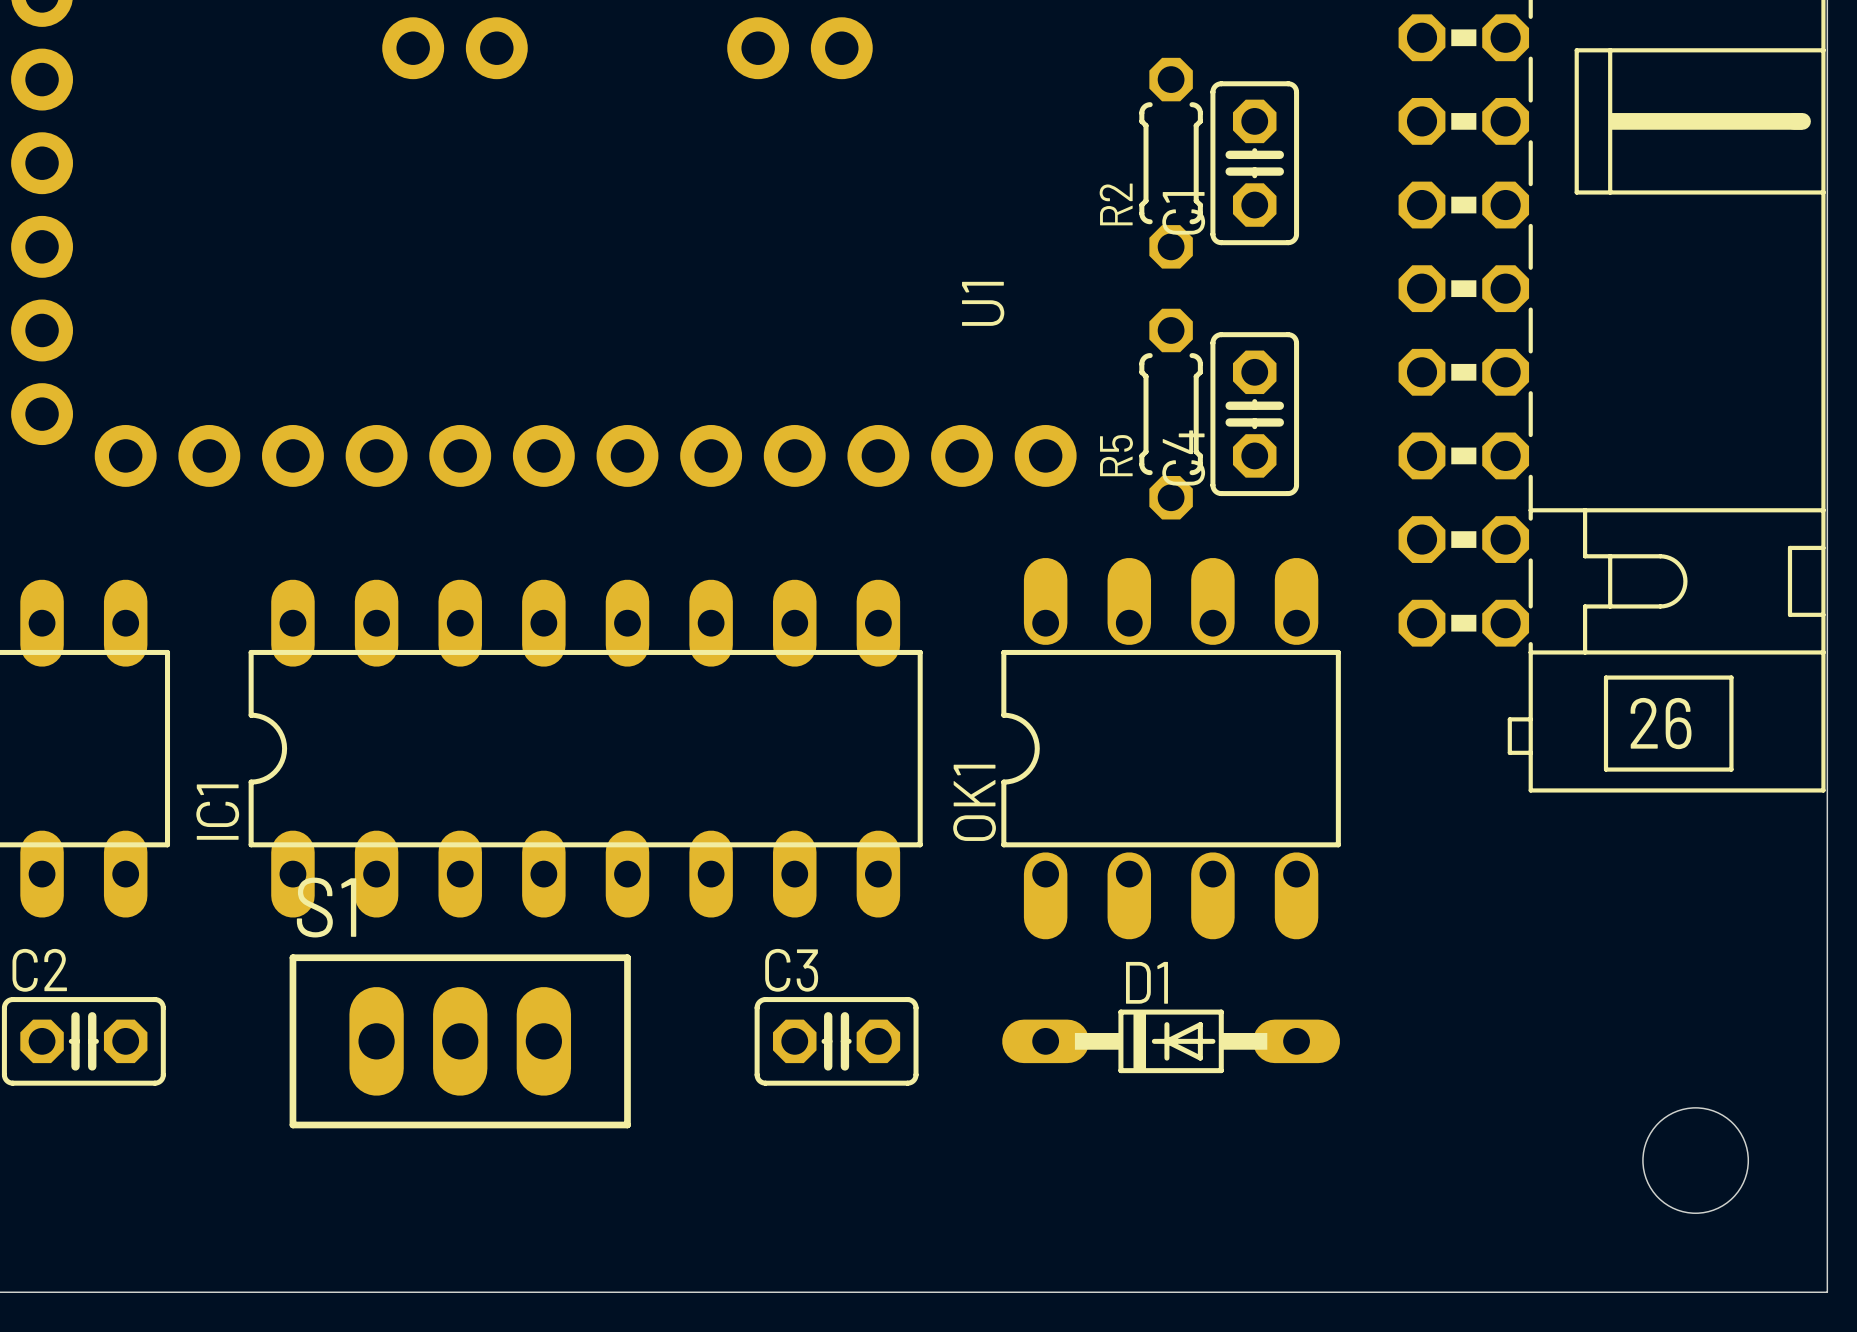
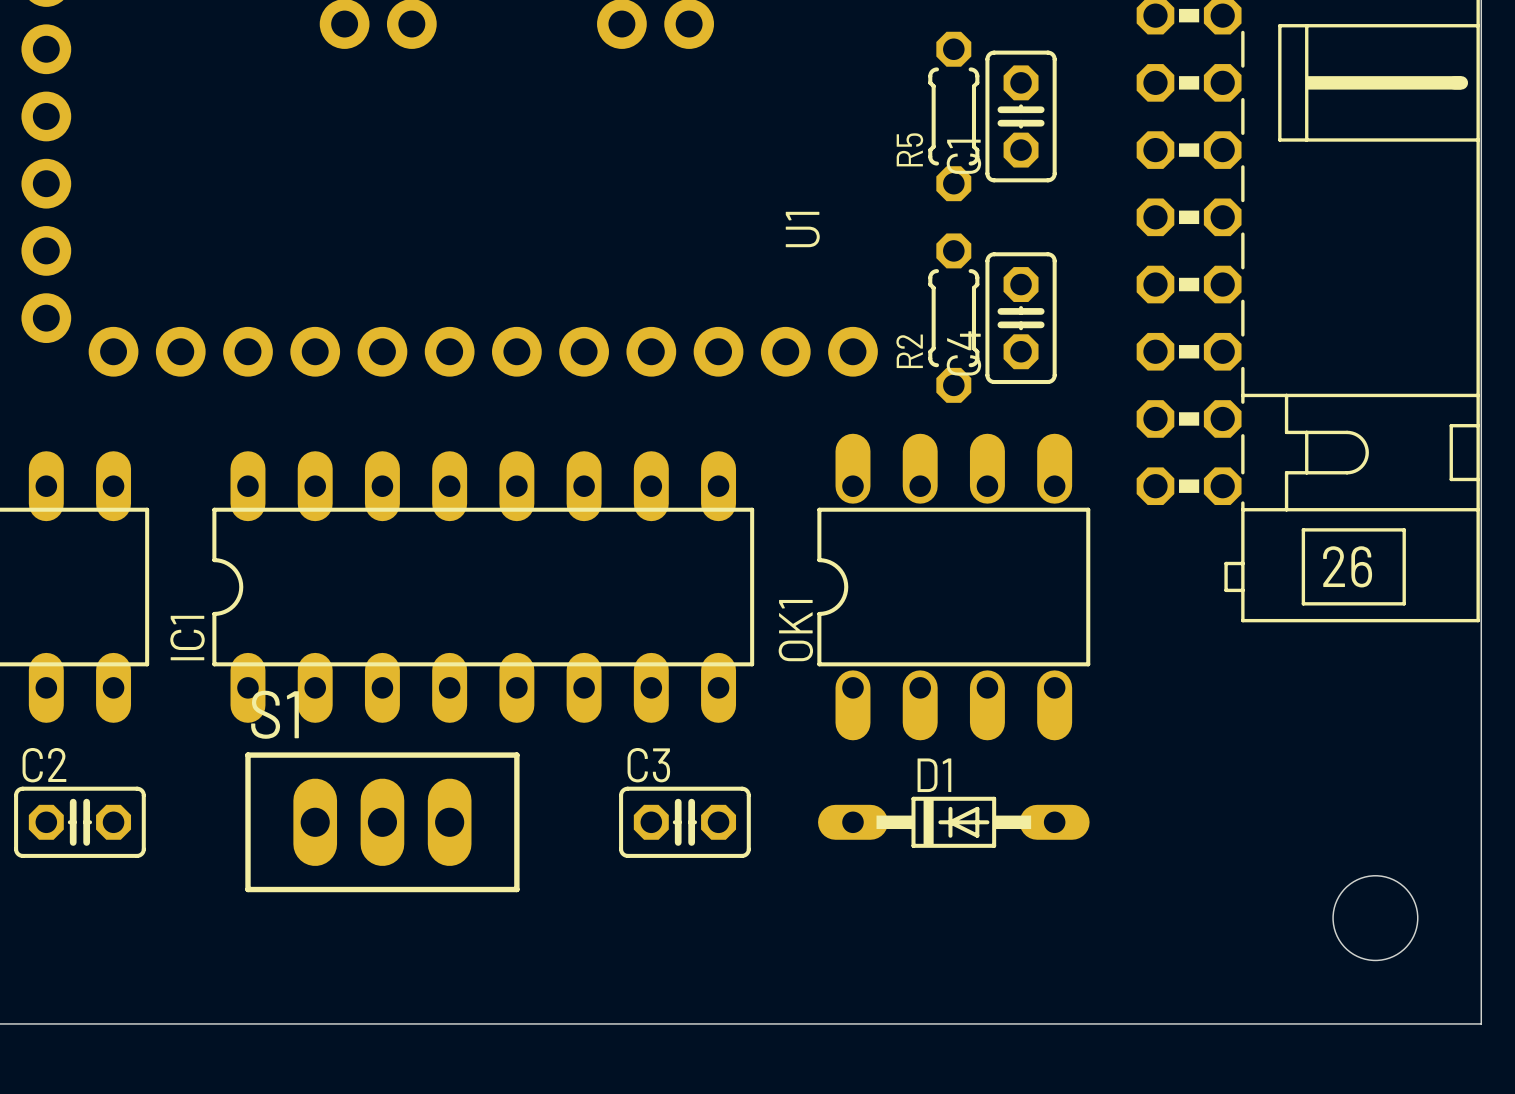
R2 name: R2 (1116, 204) -> R5 (909, 149)
R5 name: R5 (1116, 455) -> R2 (909, 351)

